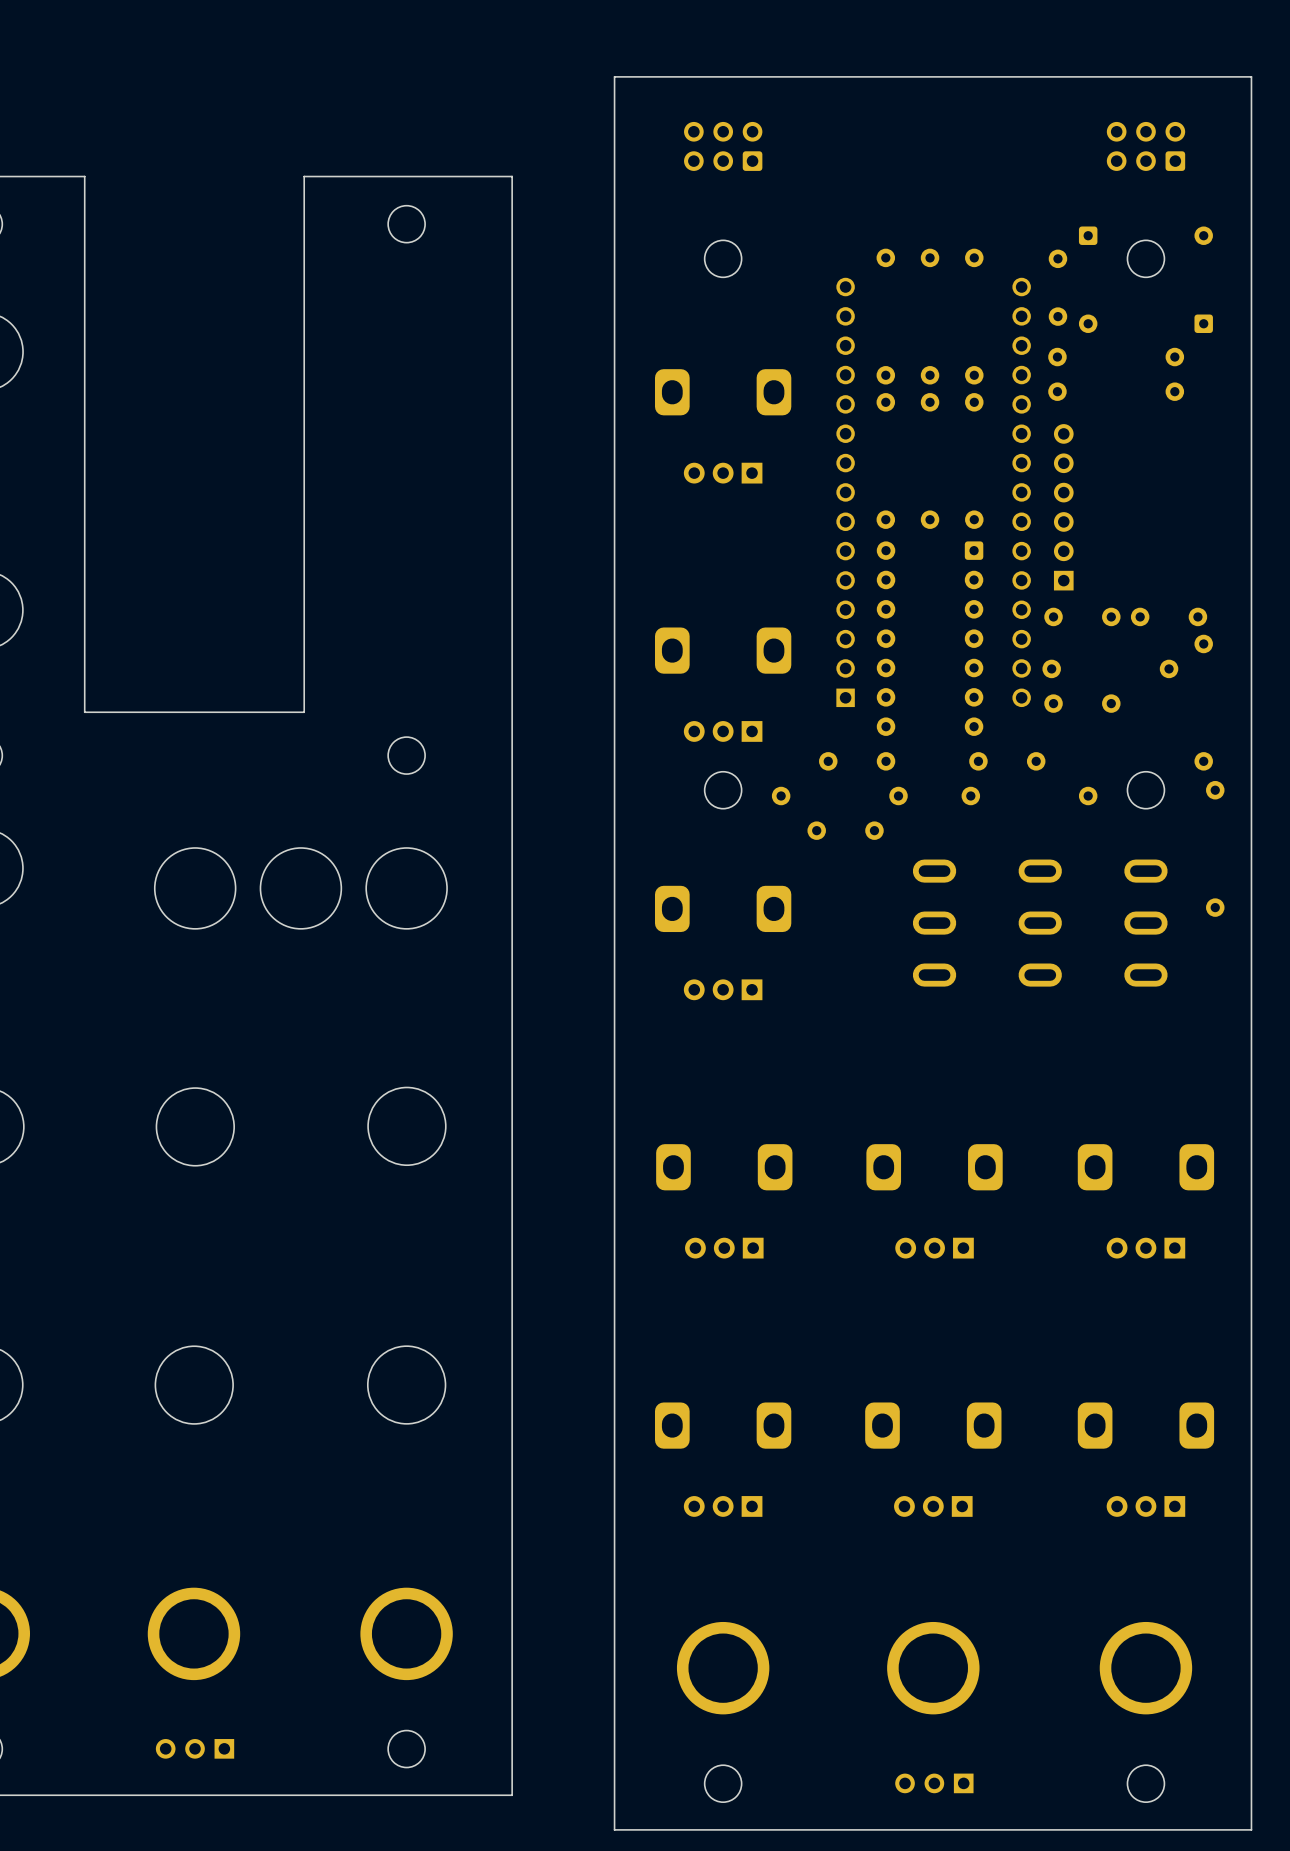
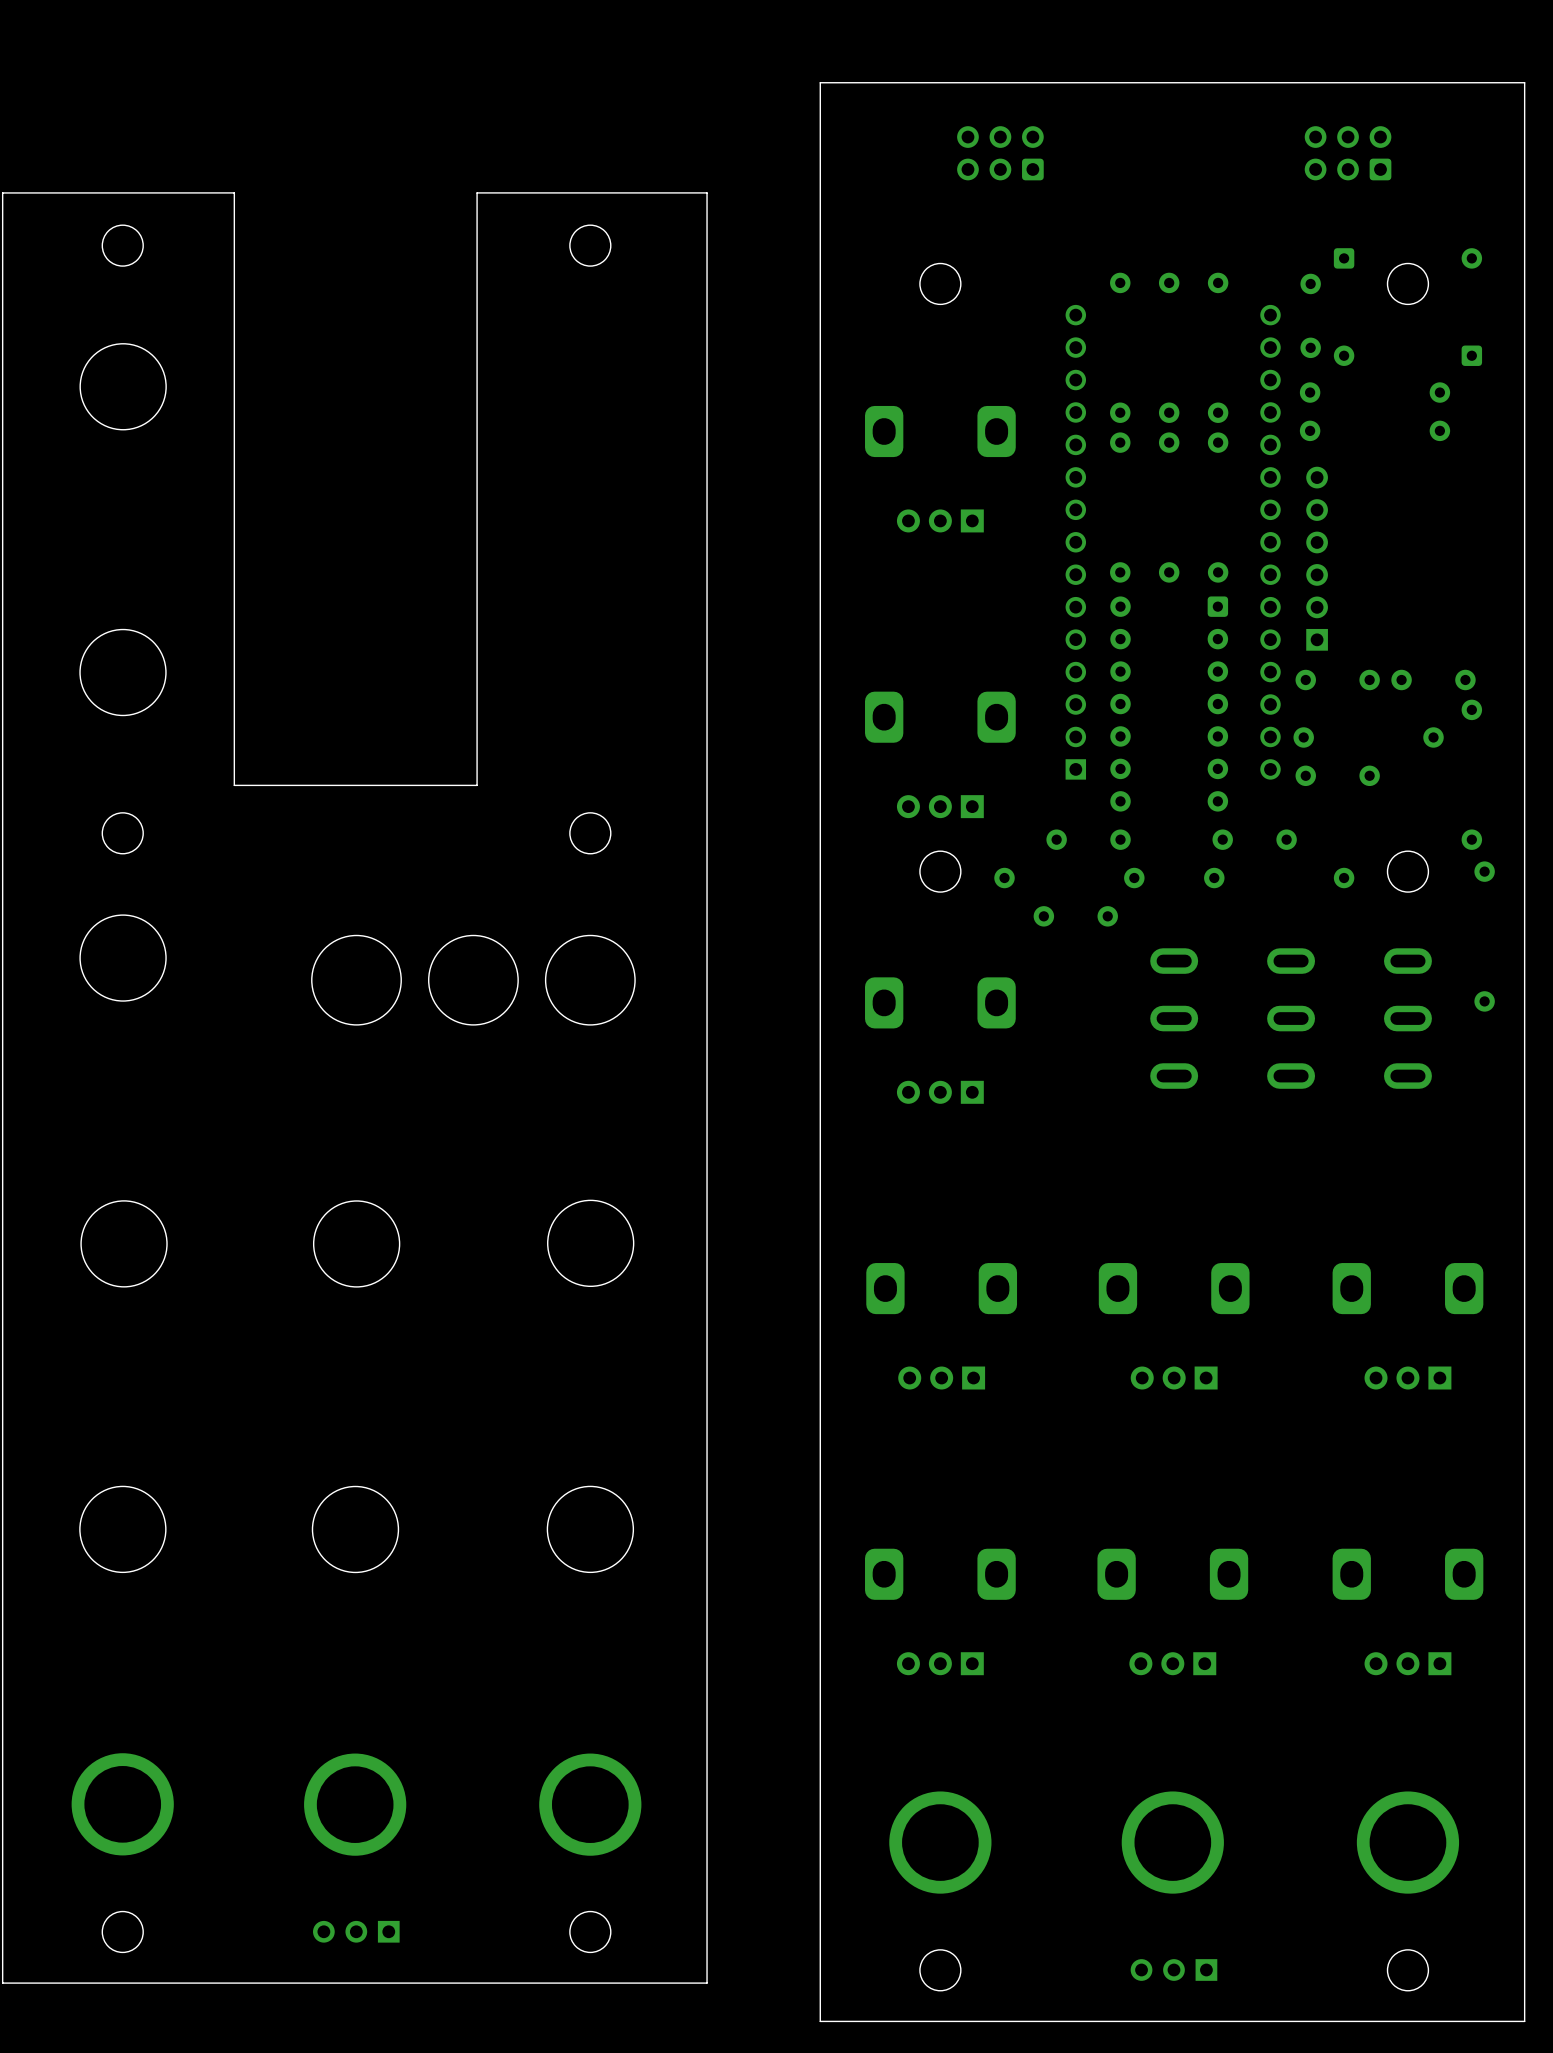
part position: (723, 146) -> (1000, 153)
part position: (1146, 146) -> (1348, 153)

